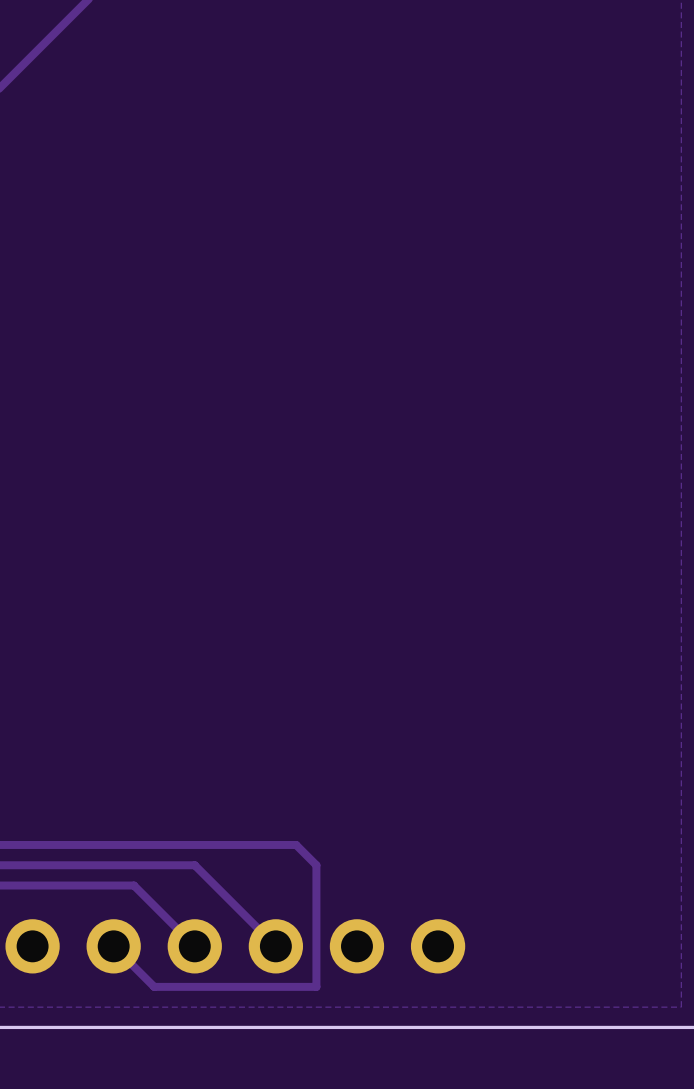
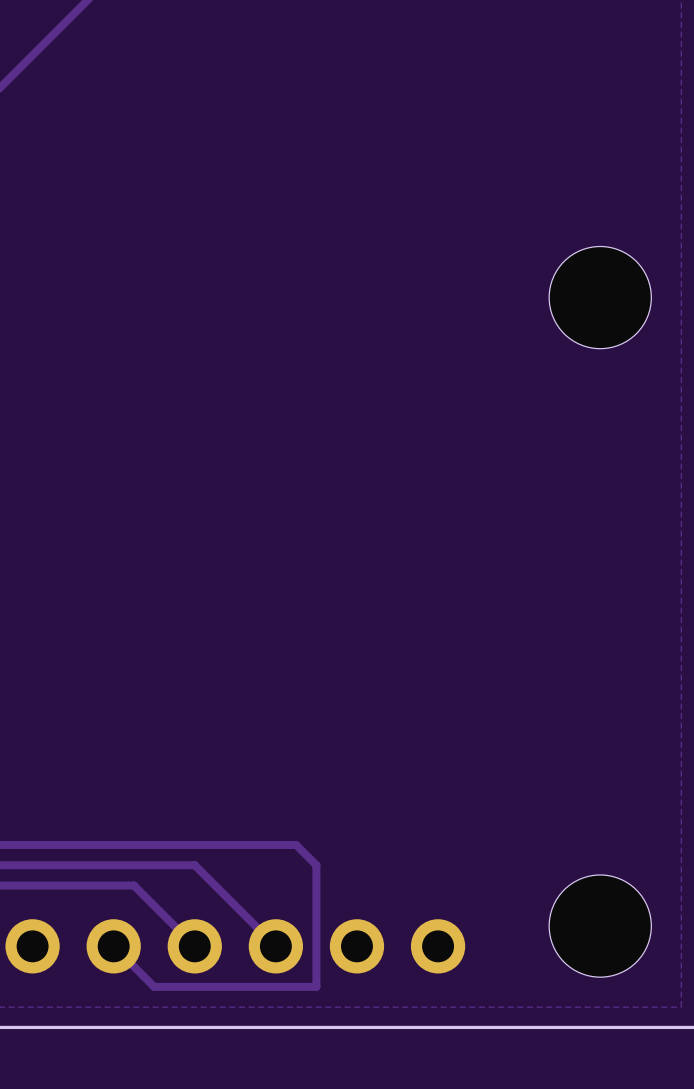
part: none -> (600, 297)
part: none -> (600, 926)

